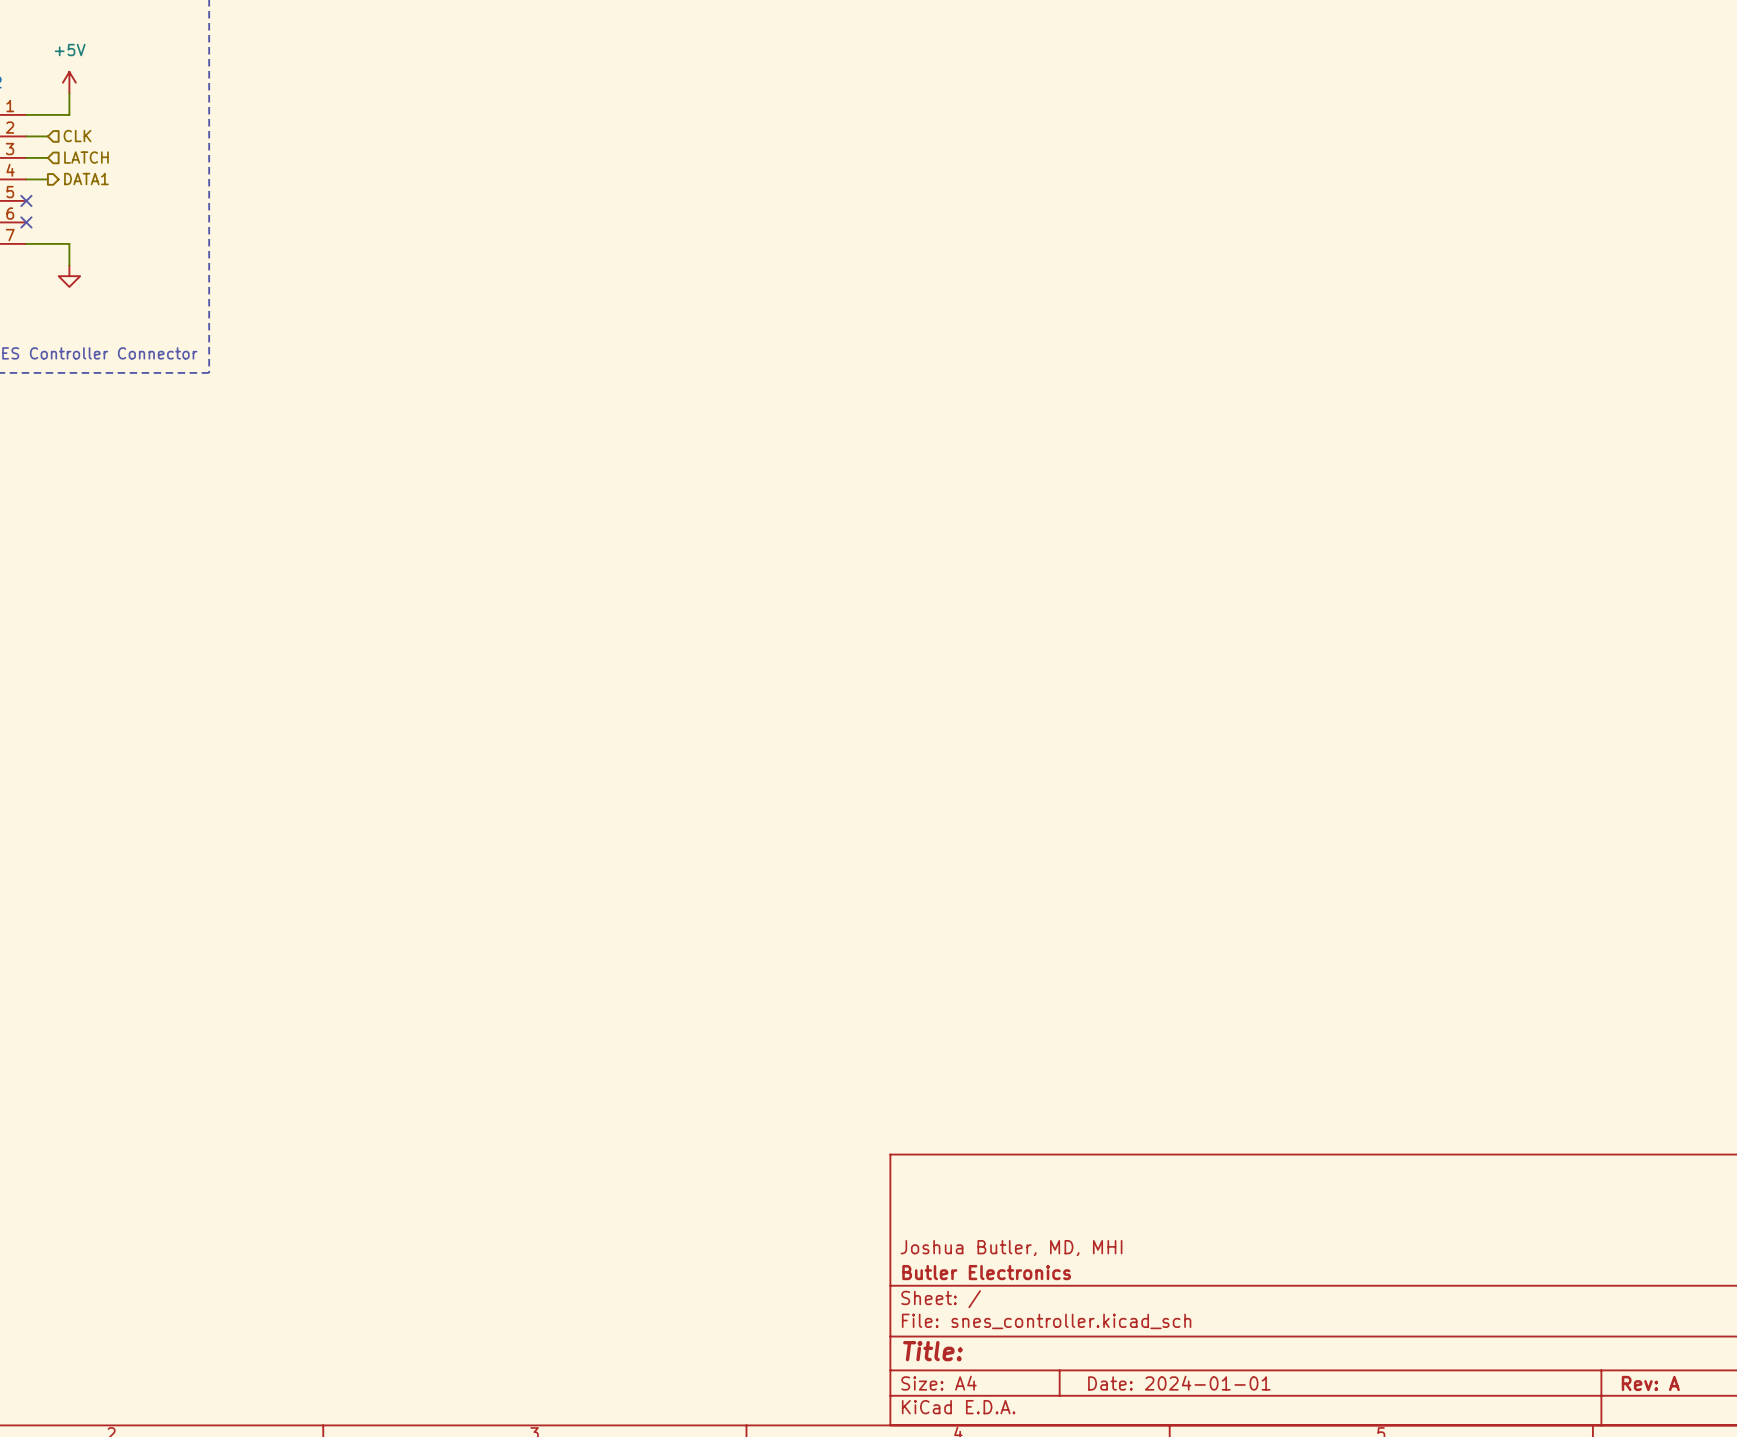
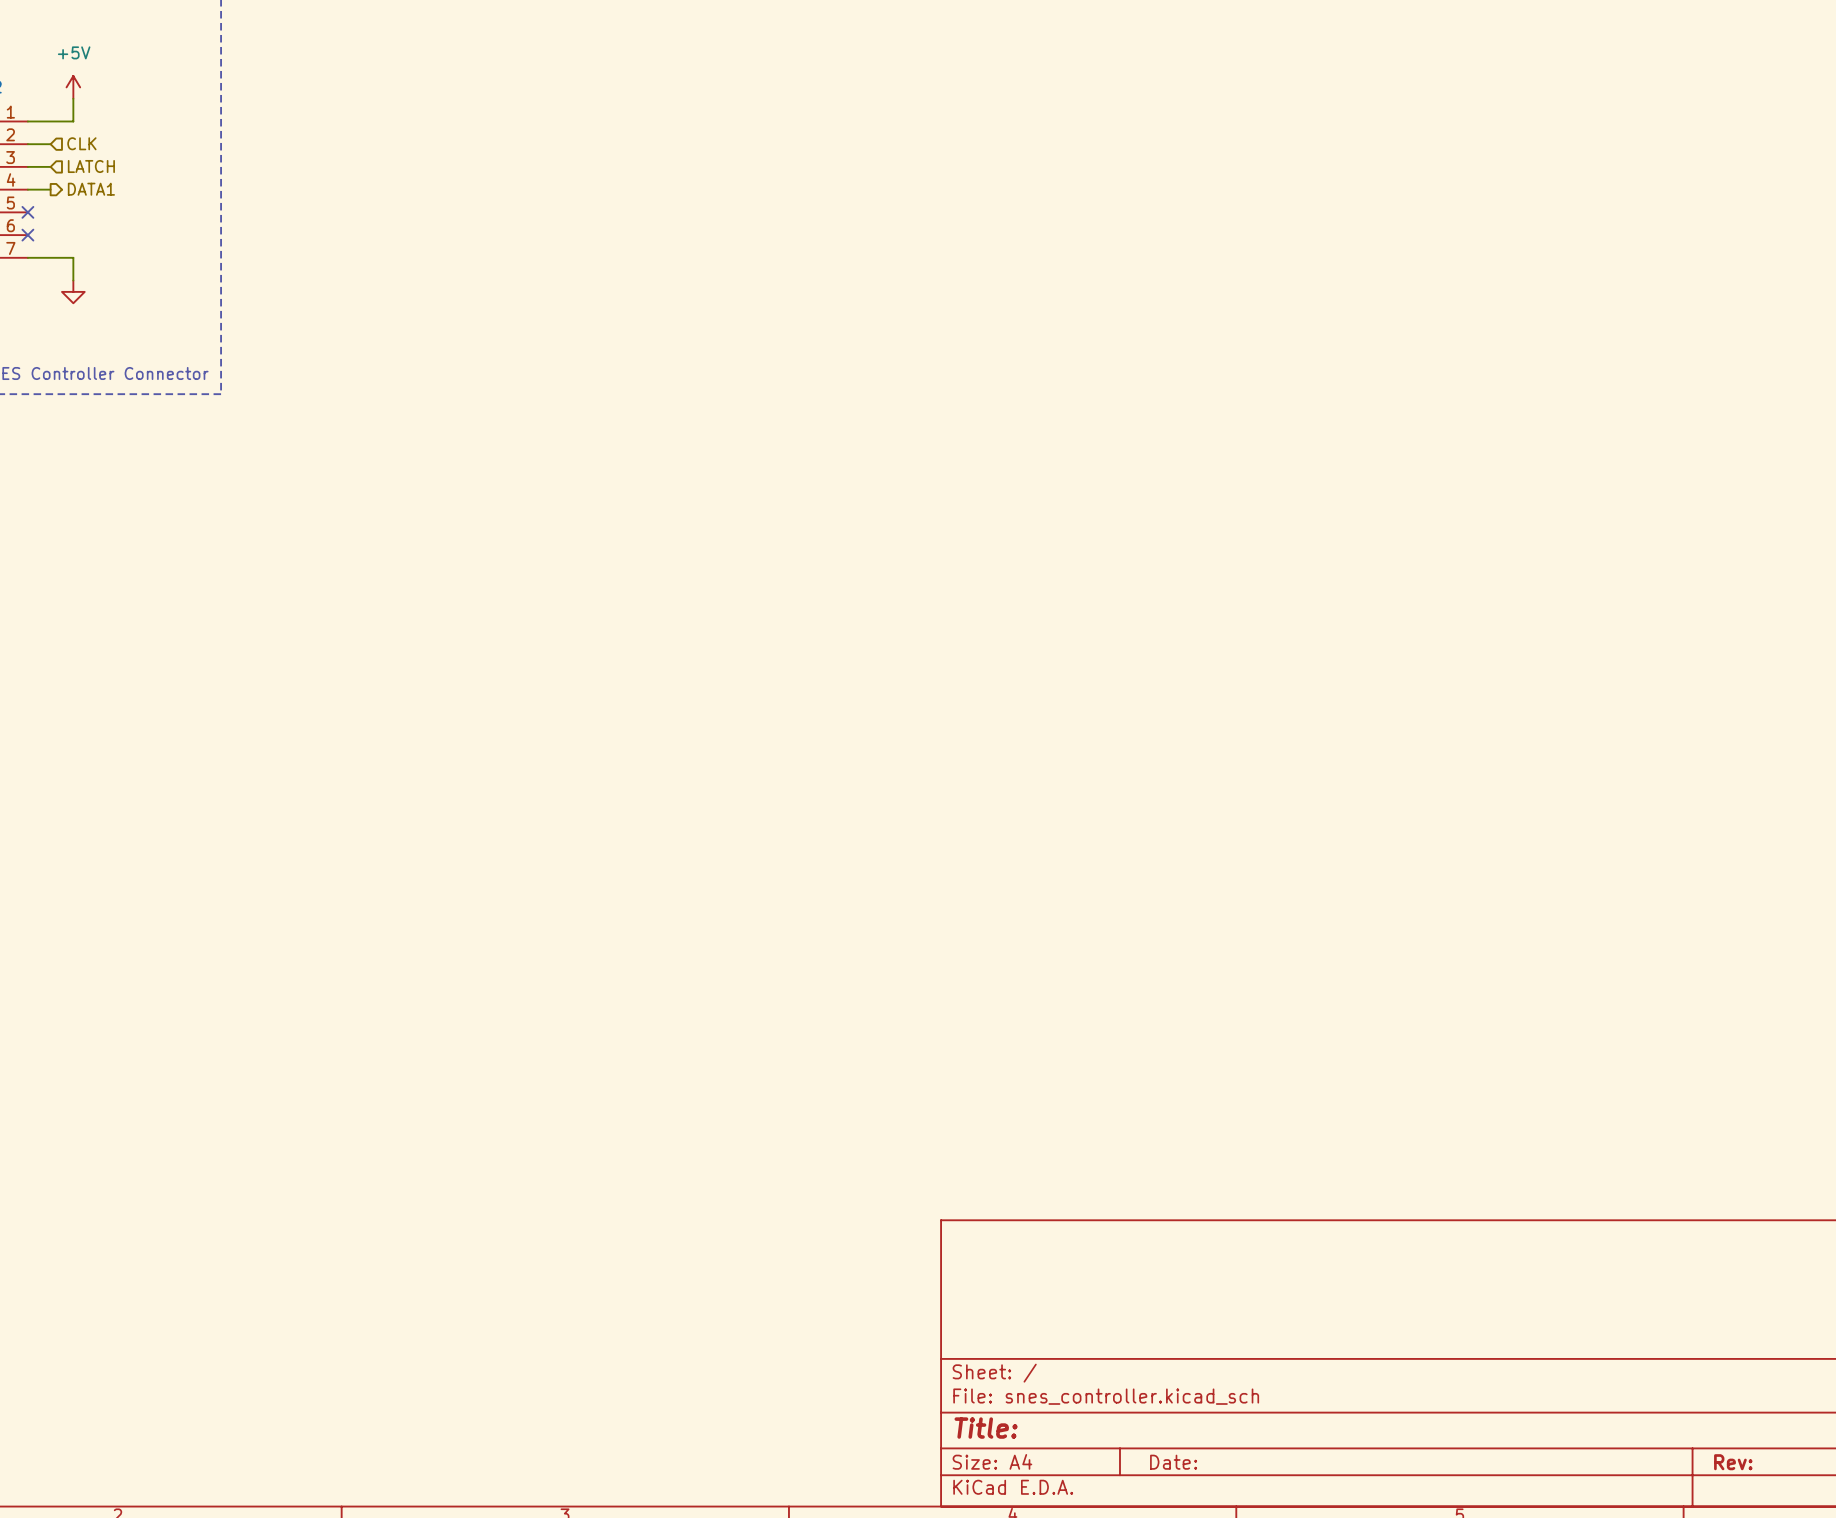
title block: Joshua Butler, MD, MHI (1011, 1248) -> none
title block: Butler Electronics (986, 1272) -> none
title block: Date: 2024-01-01 (1179, 1383) -> Date: (1173, 1462)
title block: Rev: A (1650, 1383) -> Rev: (1733, 1462)

